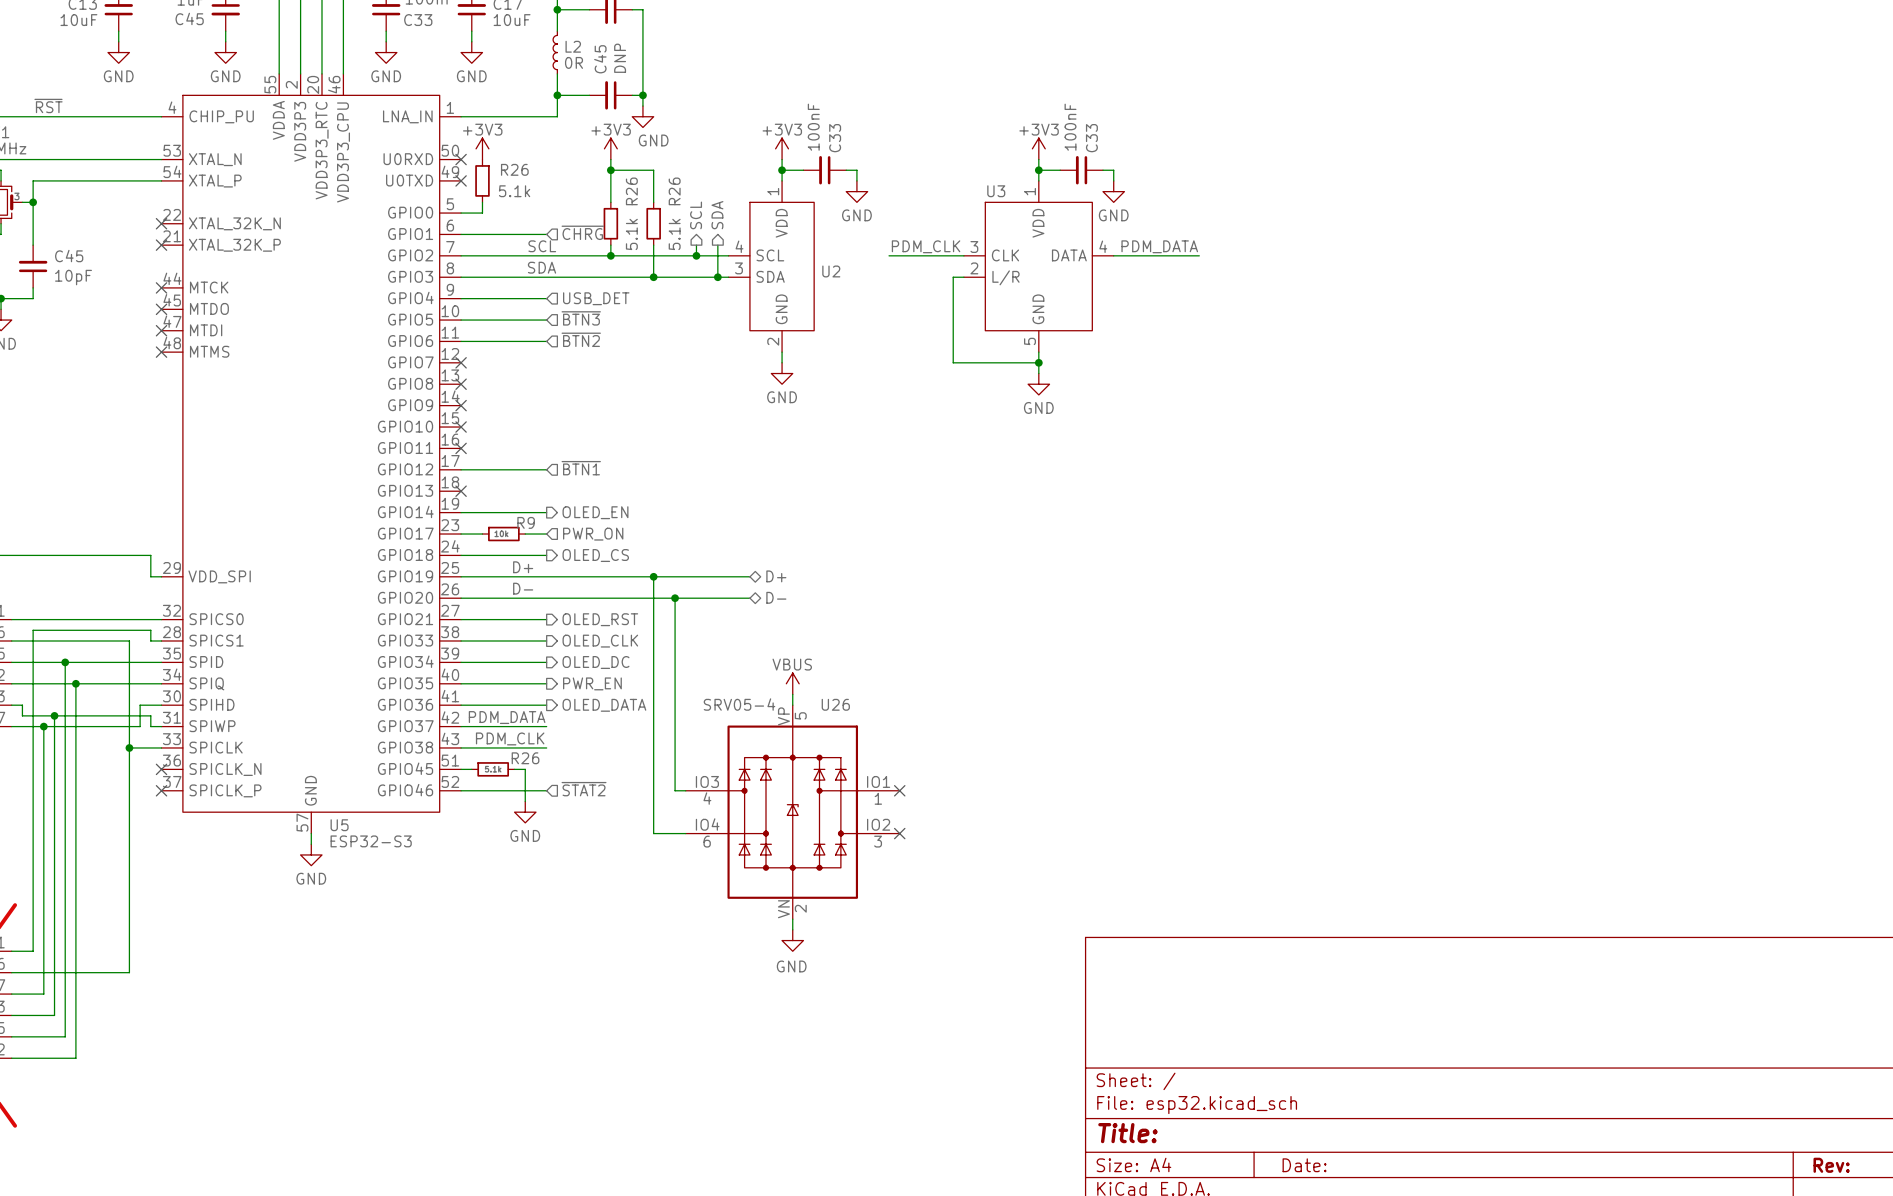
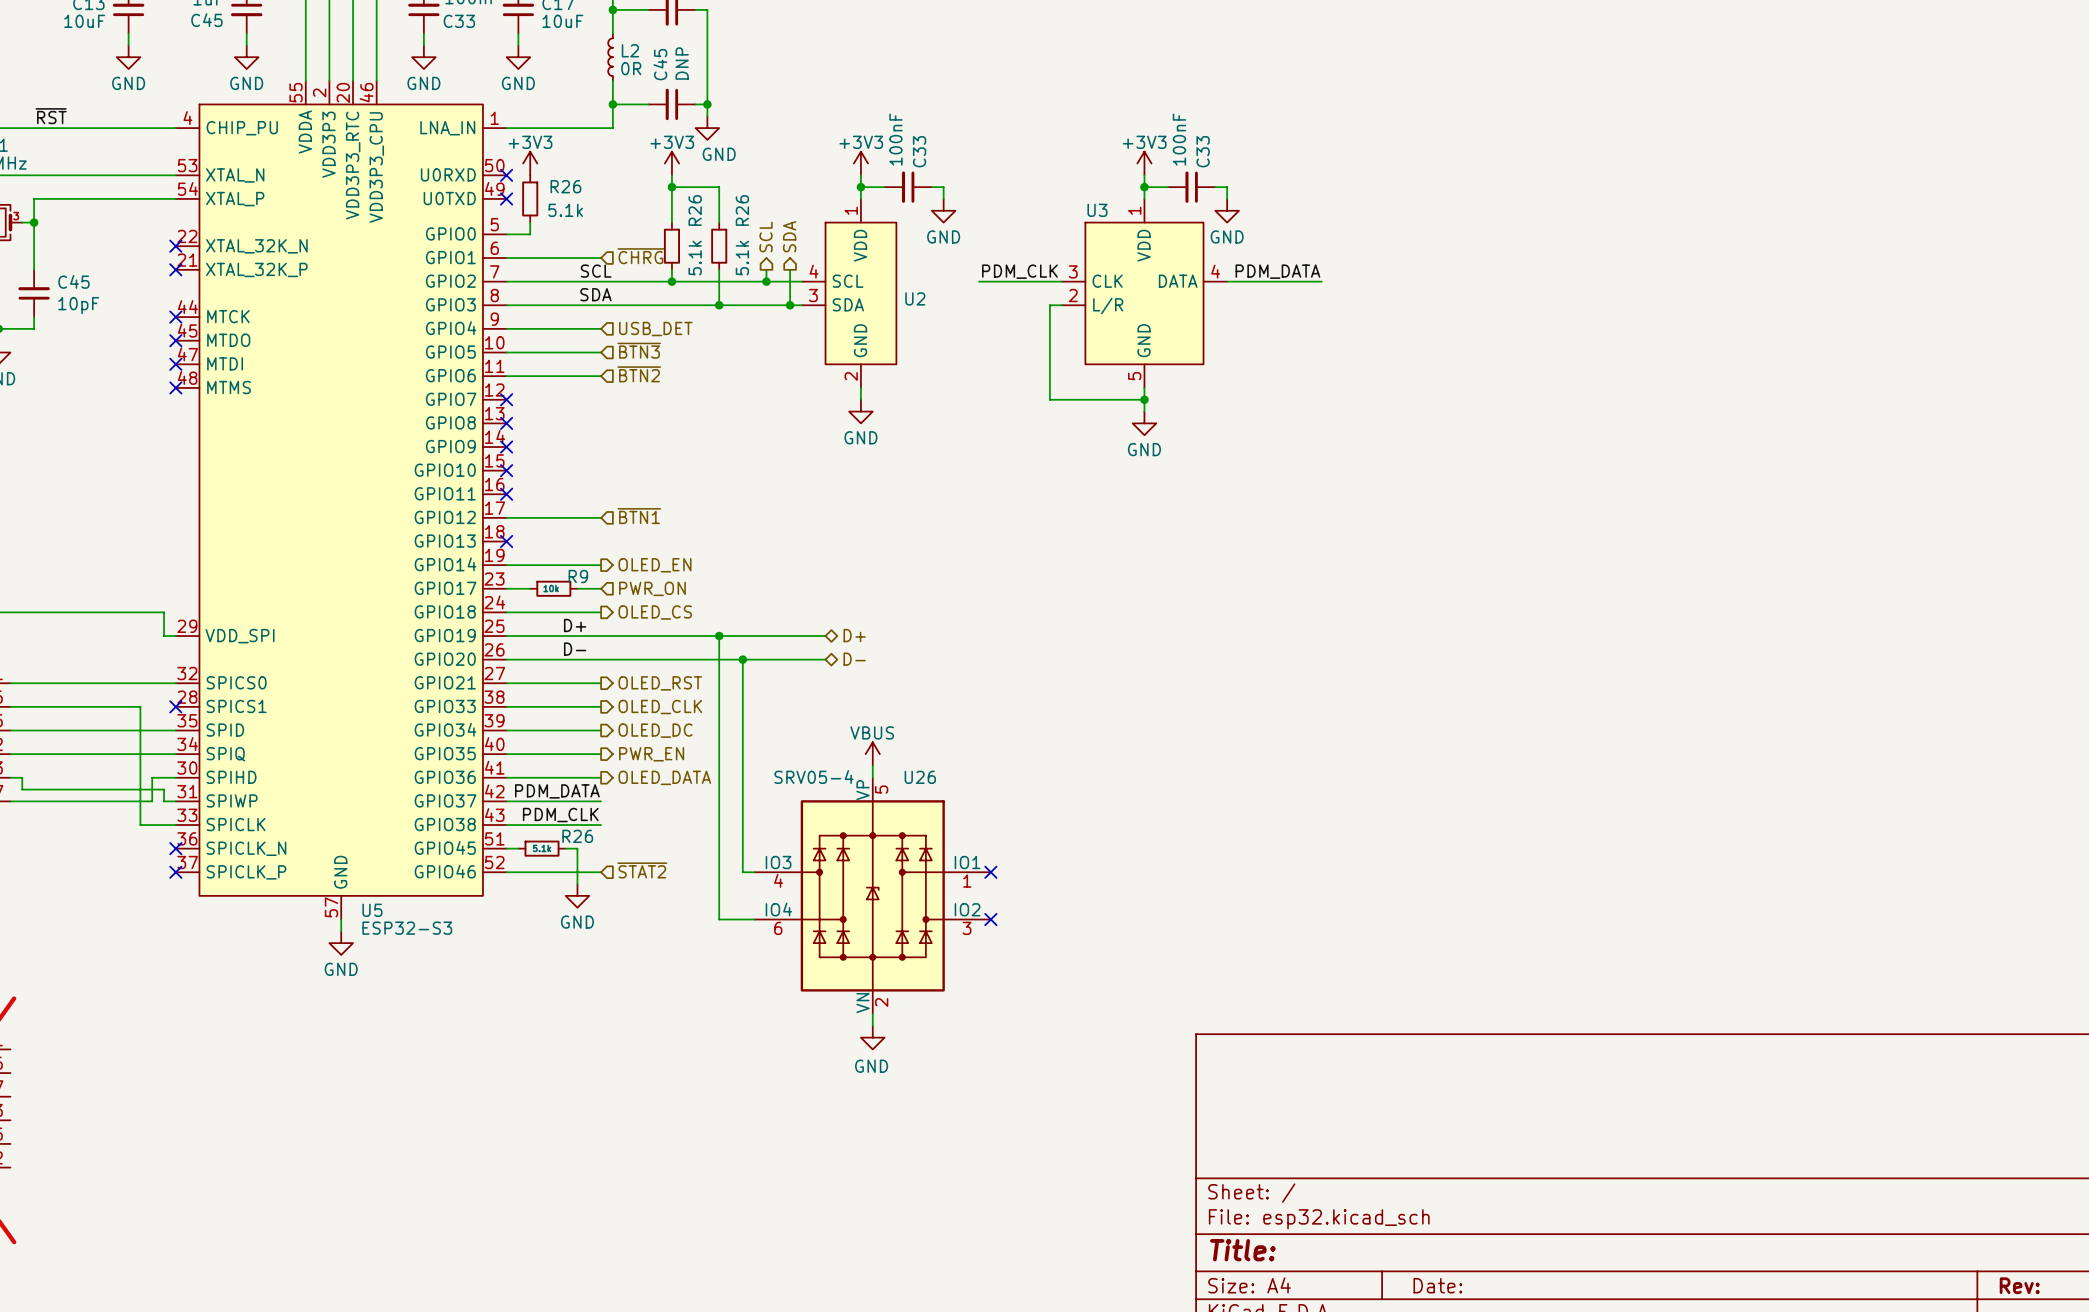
wire: (161, 640) (150, 640) (150, 630) (33, 630) (33, 951) (11, 951) -> none
no-connect mark: none -> (175, 706)
wire: (65, 662) (65, 1036) (11, 1036) -> none
junction: (65, 662) -> none
wire: (75, 683) (75, 1058) (11, 1058) -> none
junction: (75, 683) -> none
wire: (54, 715) (54, 1015) (11, 1015) -> none
junction: (54, 715) -> none
wire: (43, 726) (43, 994) (11, 994) -> none
junction: (43, 726) -> none
wire: (129, 747) (129, 972) (11, 972) -> none
junction: (129, 747) -> none

